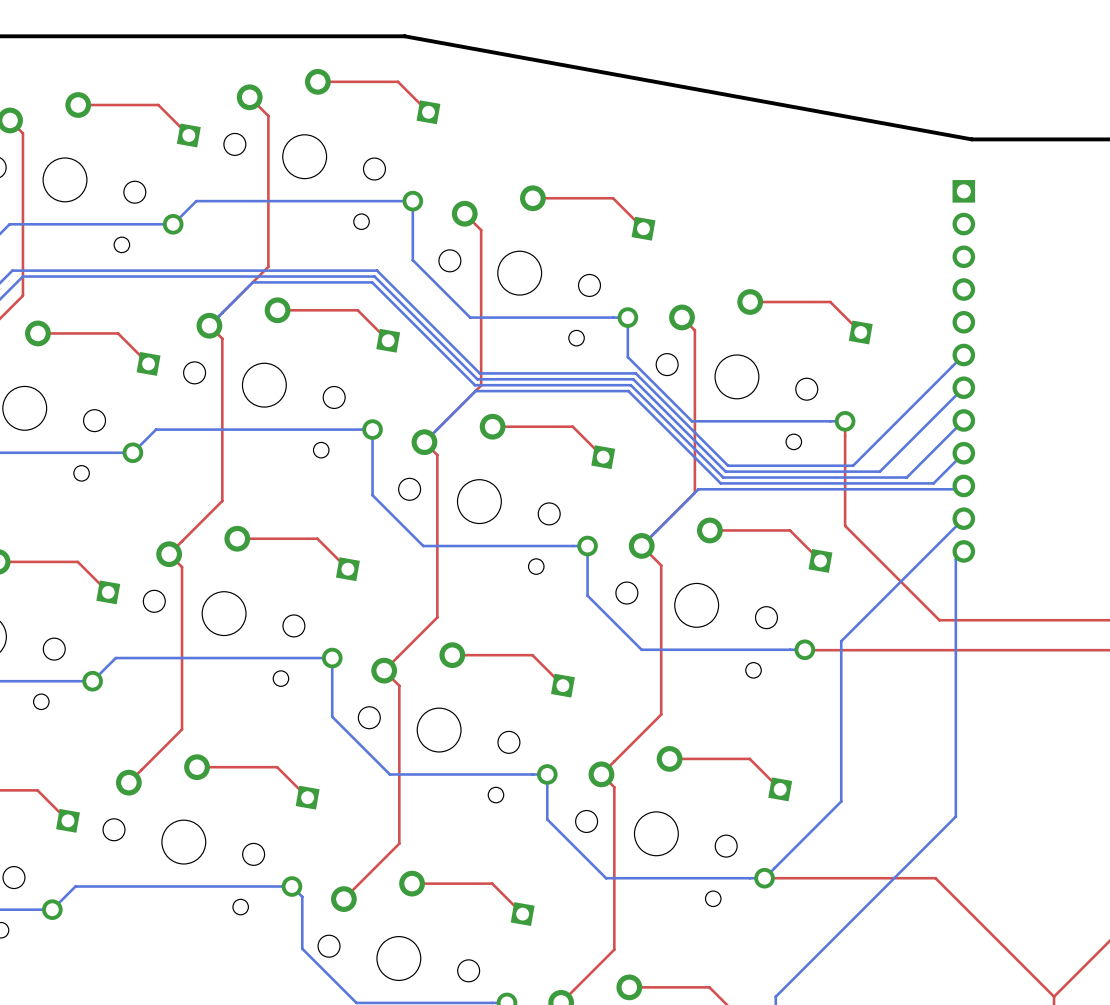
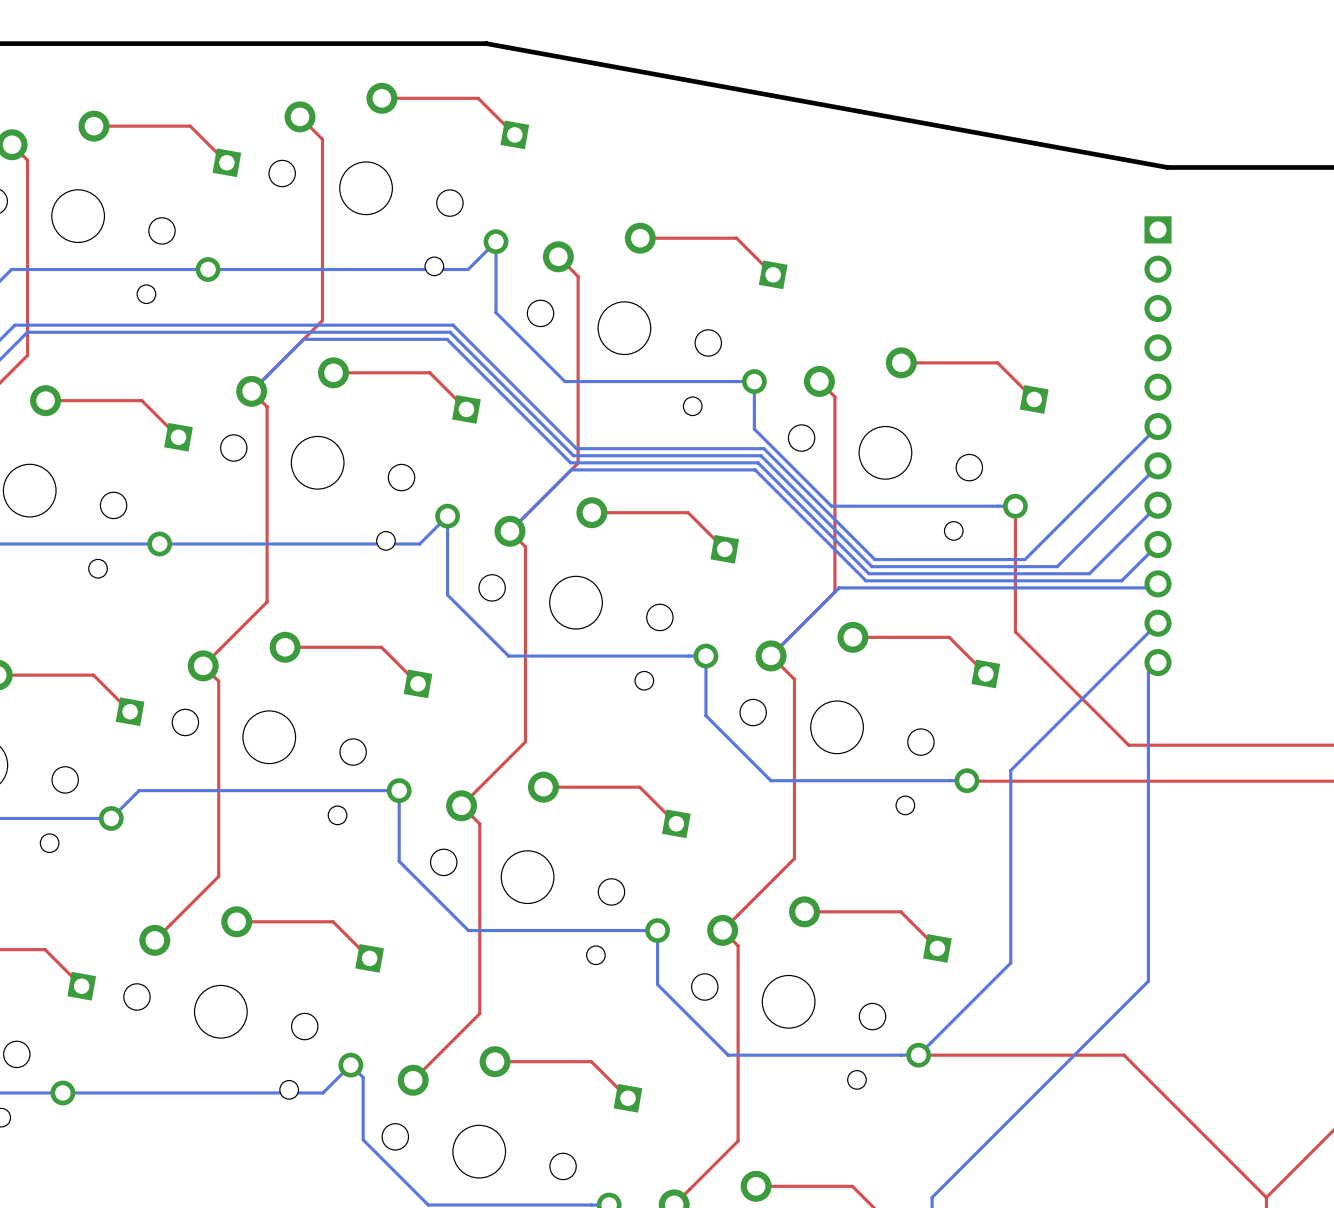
bottom track: (412, 201) (196, 201) (173, 224) -> (496, 241) (468, 269) (208, 269)
bottom track: (372, 429) (156, 429) (132, 452) -> (447, 516) (419, 543) (159, 543)
bottom track: (291, 886) (75, 886) (52, 909) -> (350, 1065) (322, 1092) (62, 1092)

